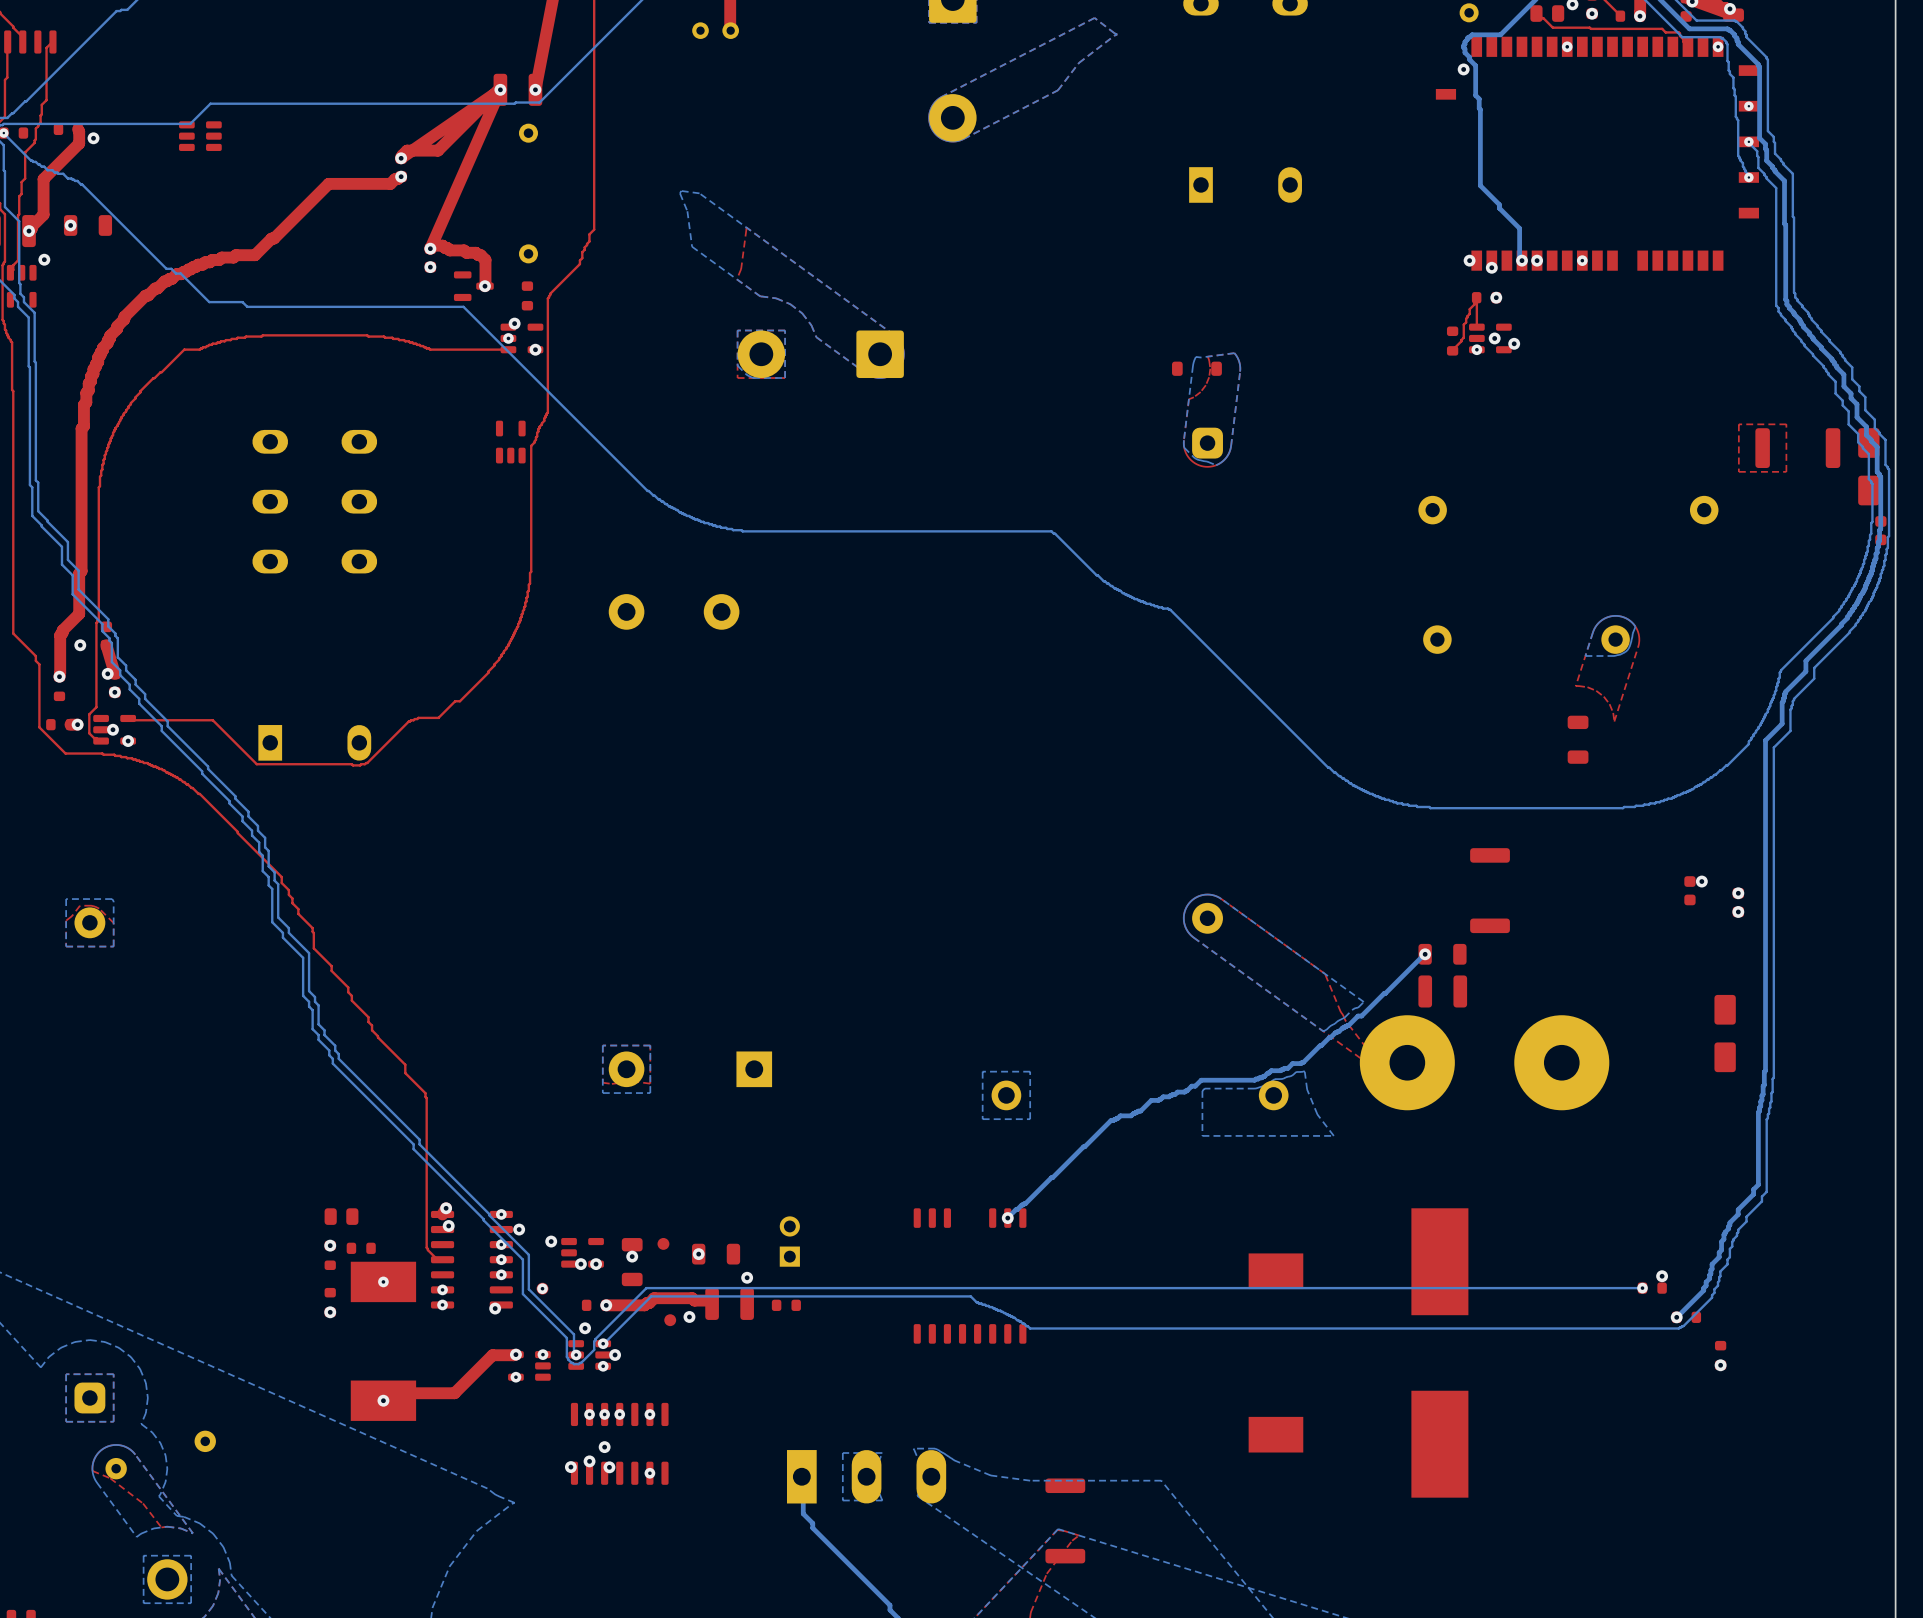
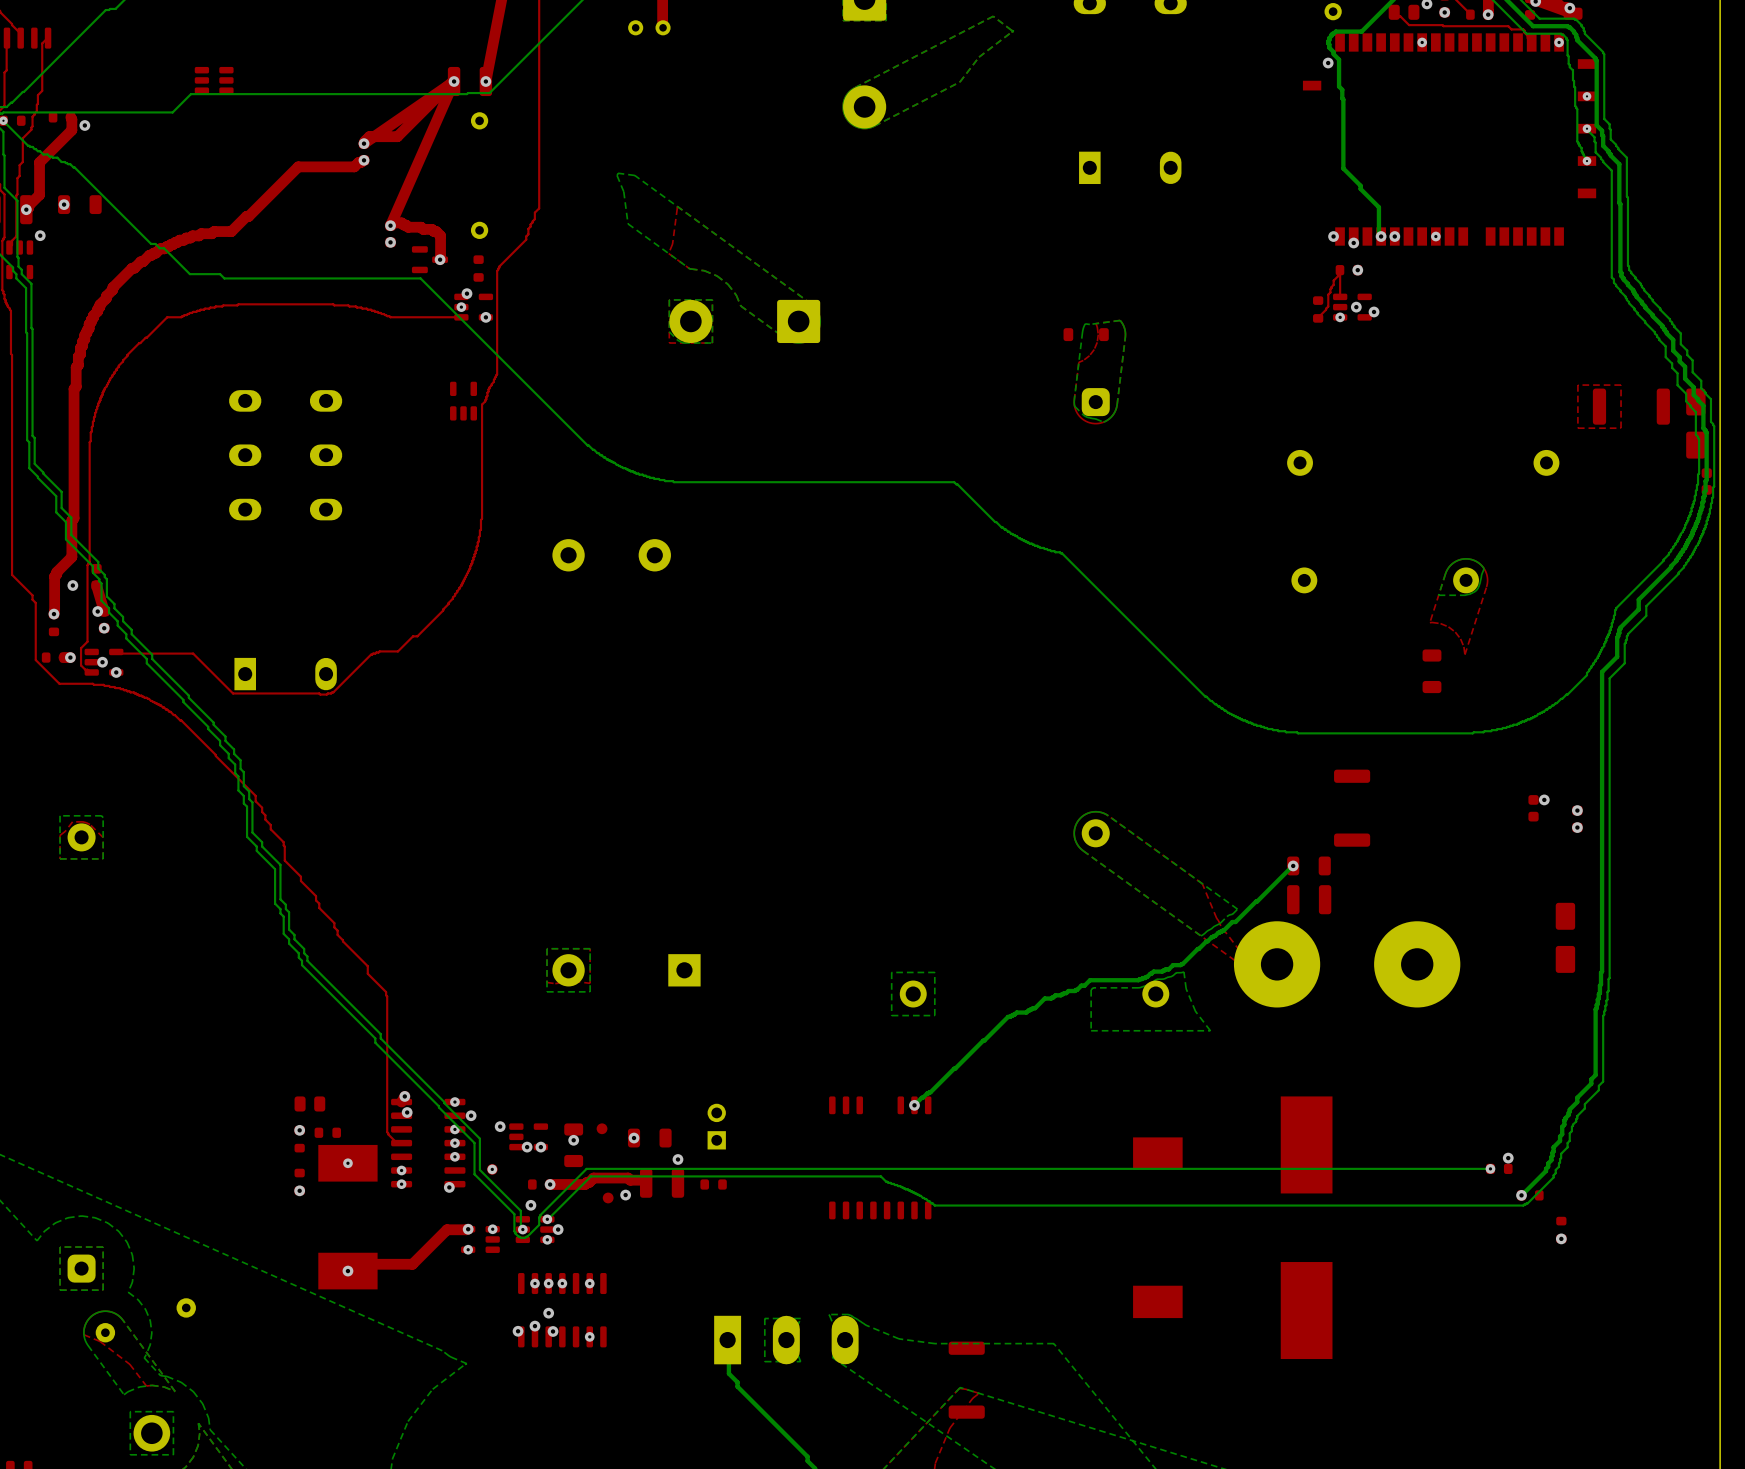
part position: (200, 136) -> (214, 80)

